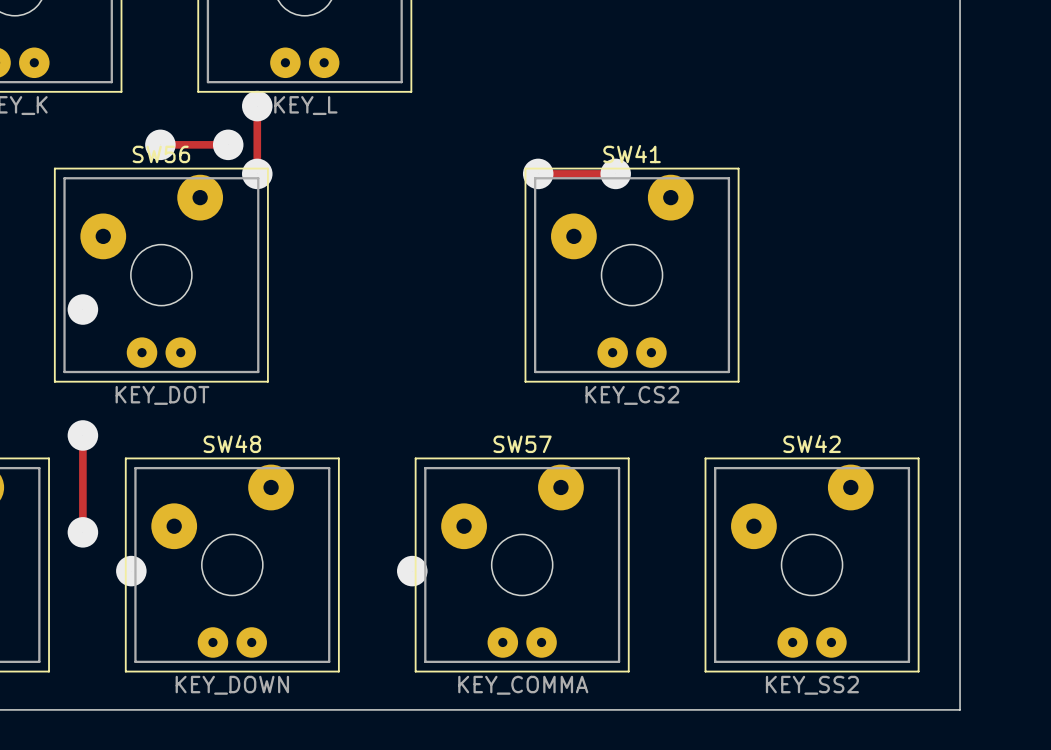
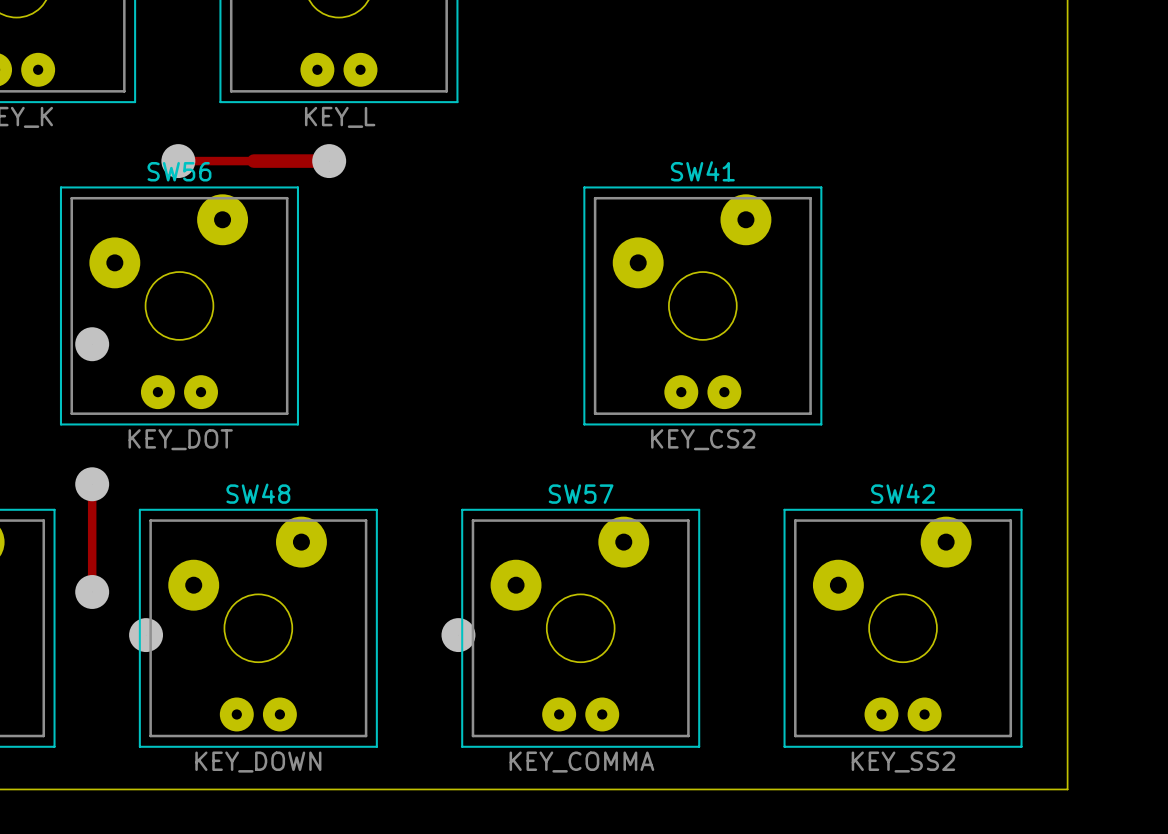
track: (257, 106) (257, 173) -> none
via: (257, 106) -> none
track: none -> (253, 161) (329, 161)
via: (228, 144) -> none
via: none -> (329, 161)
via: (257, 173) -> none
track: (538, 173) (615, 173) -> none
via: (538, 173) -> none
via: (615, 173) -> none

